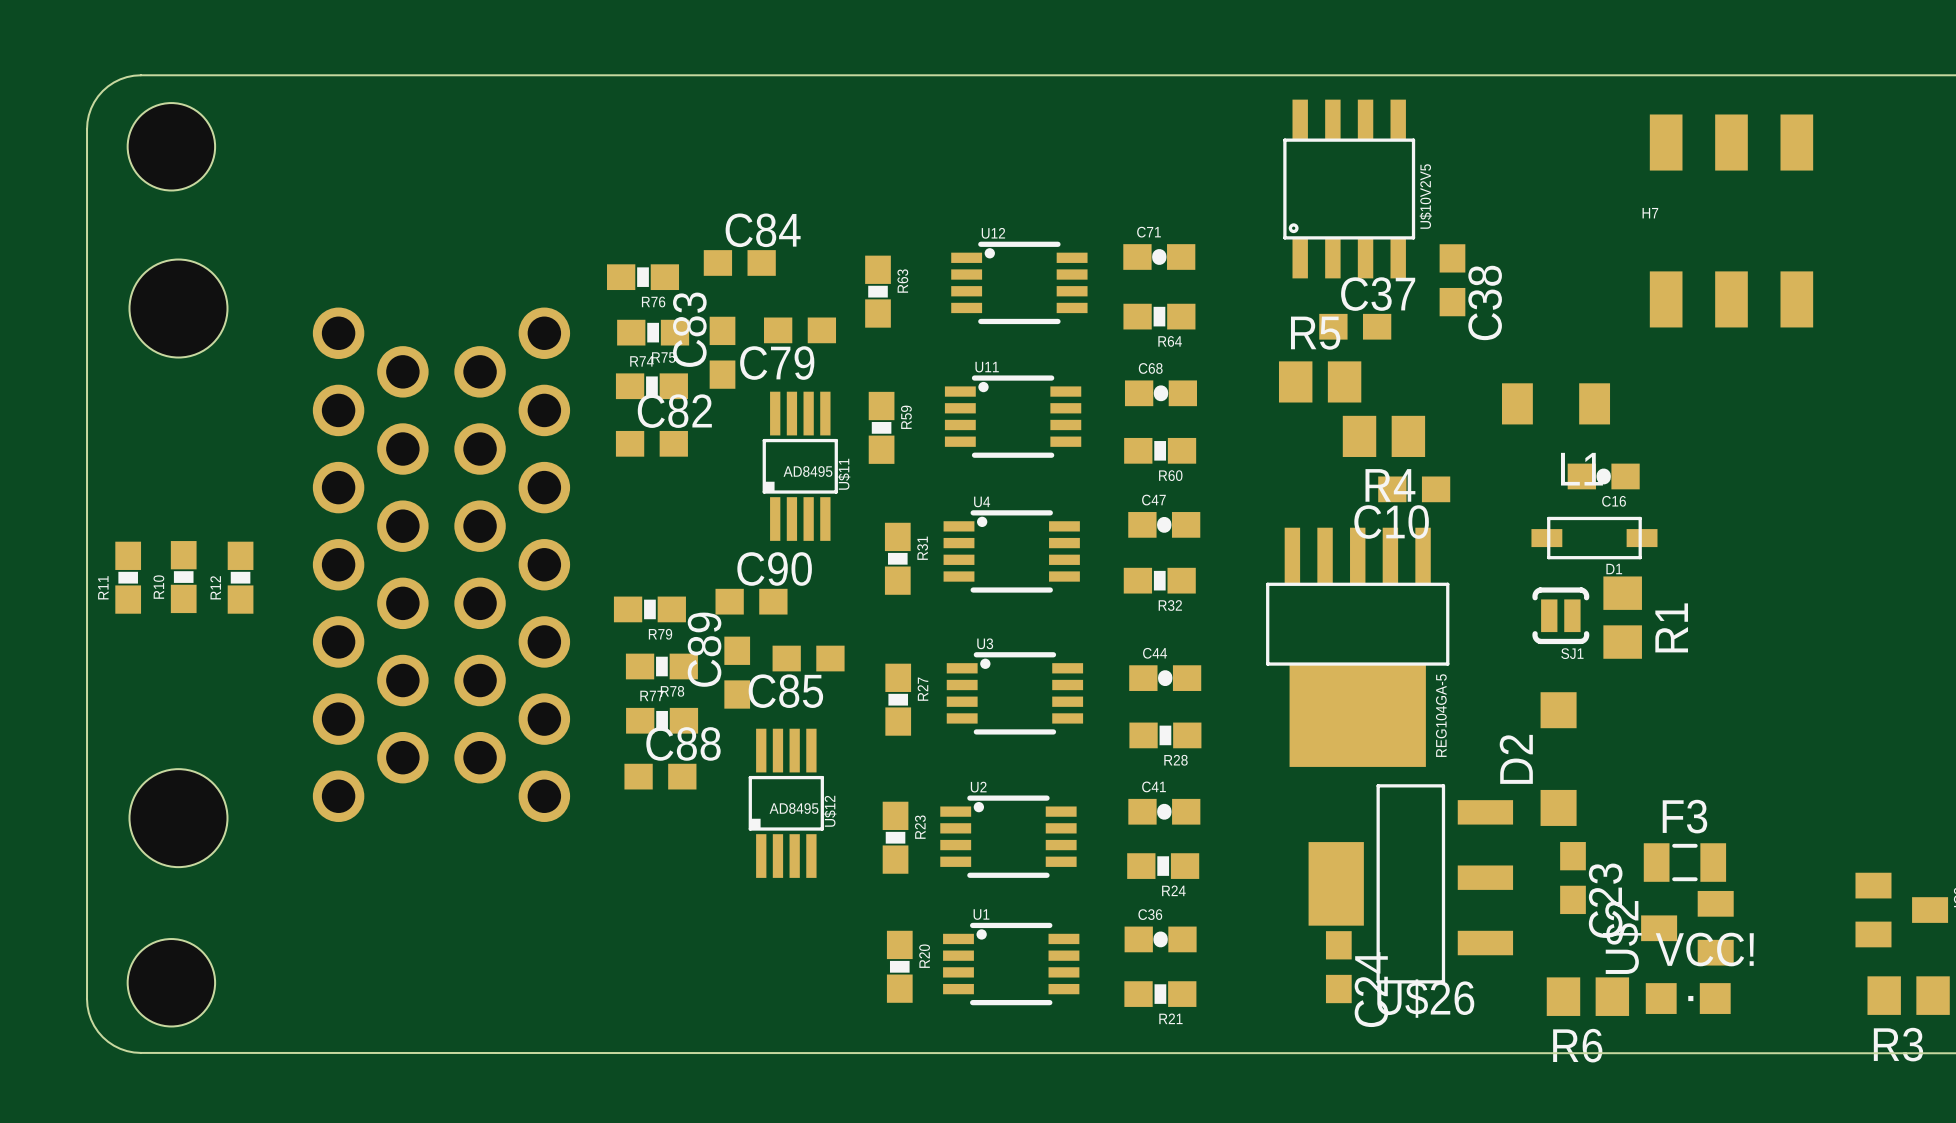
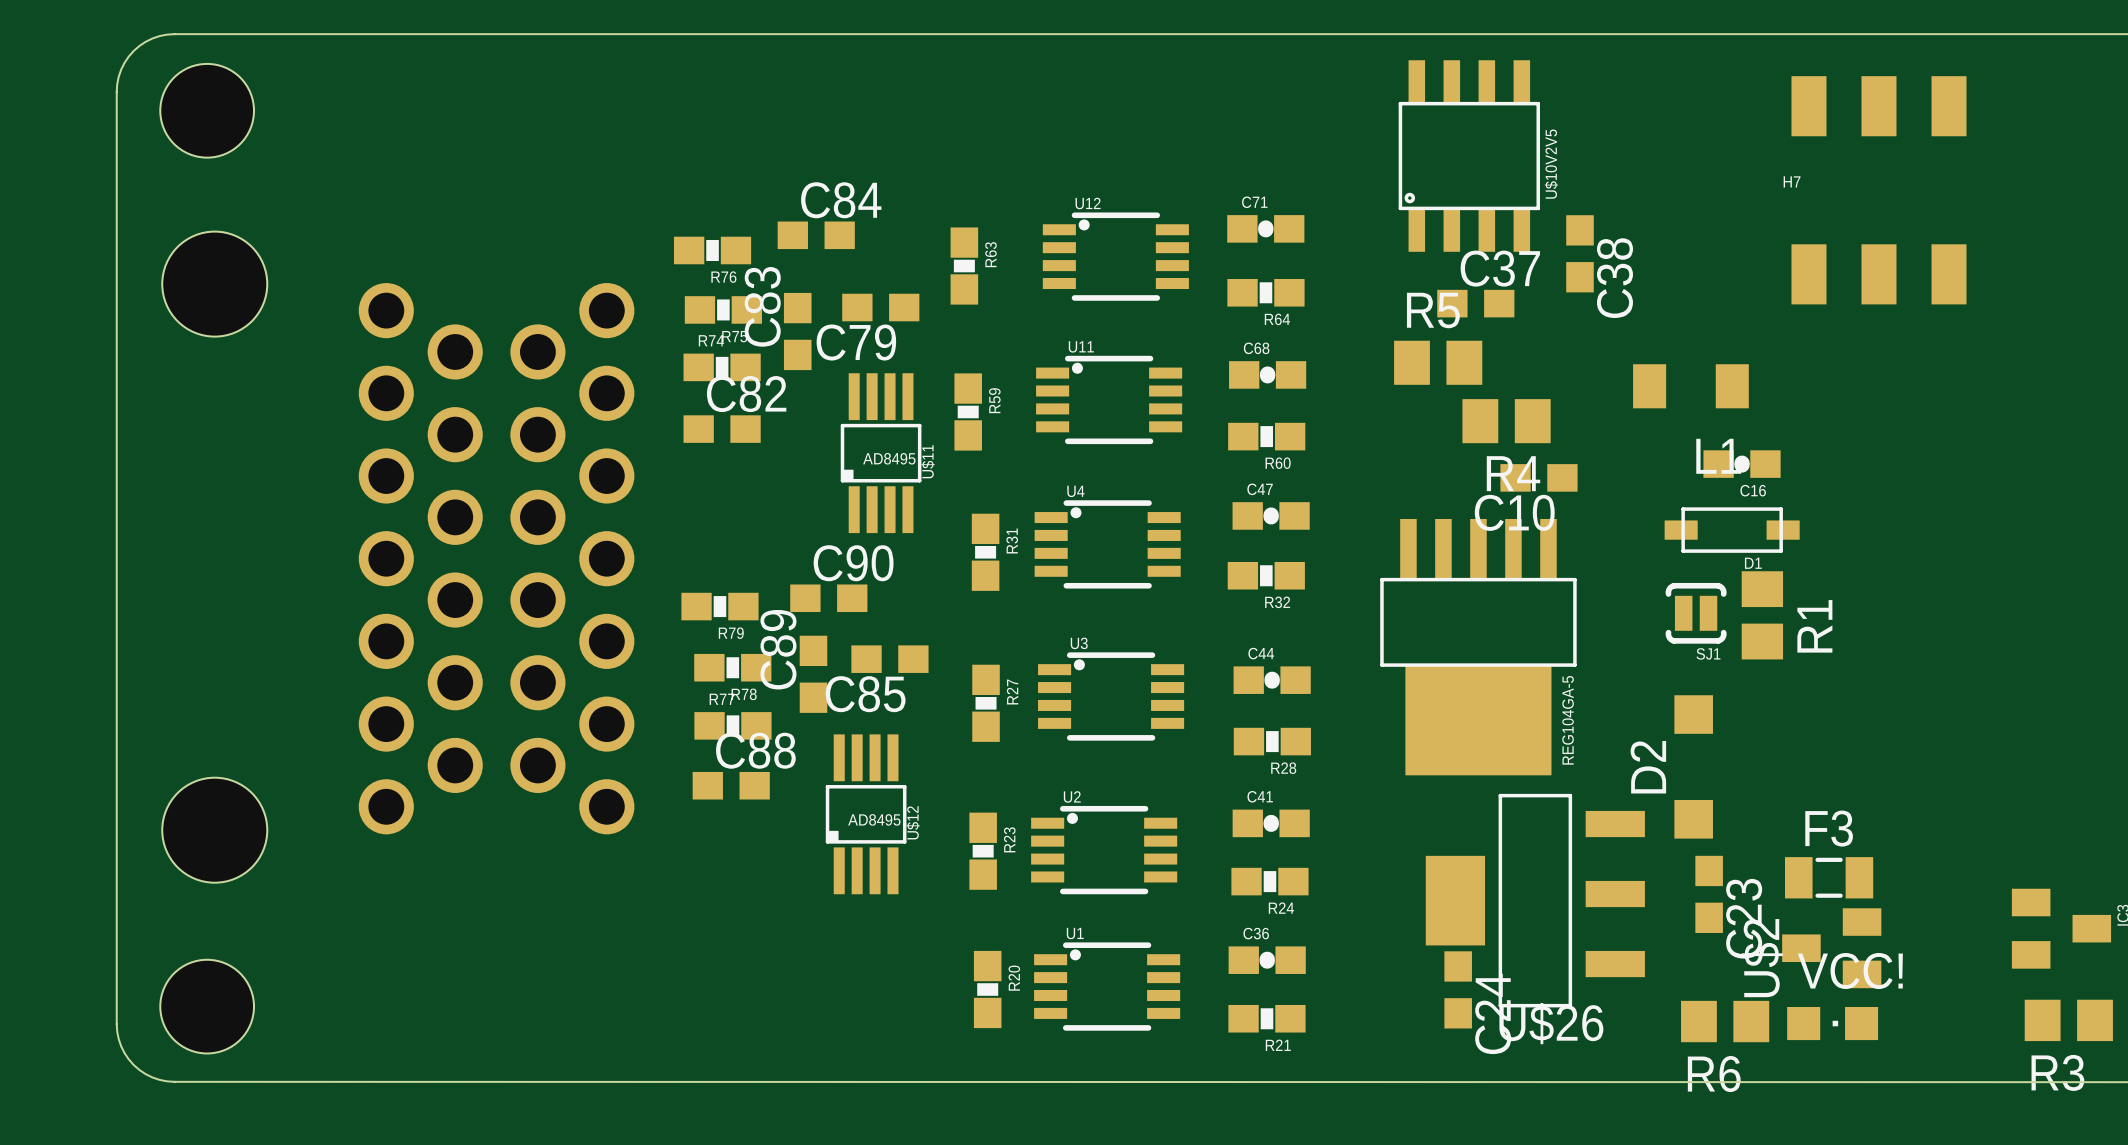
R11: (128, 577) -> none
R10: (183, 577) -> none
R12: (240, 577) -> none

